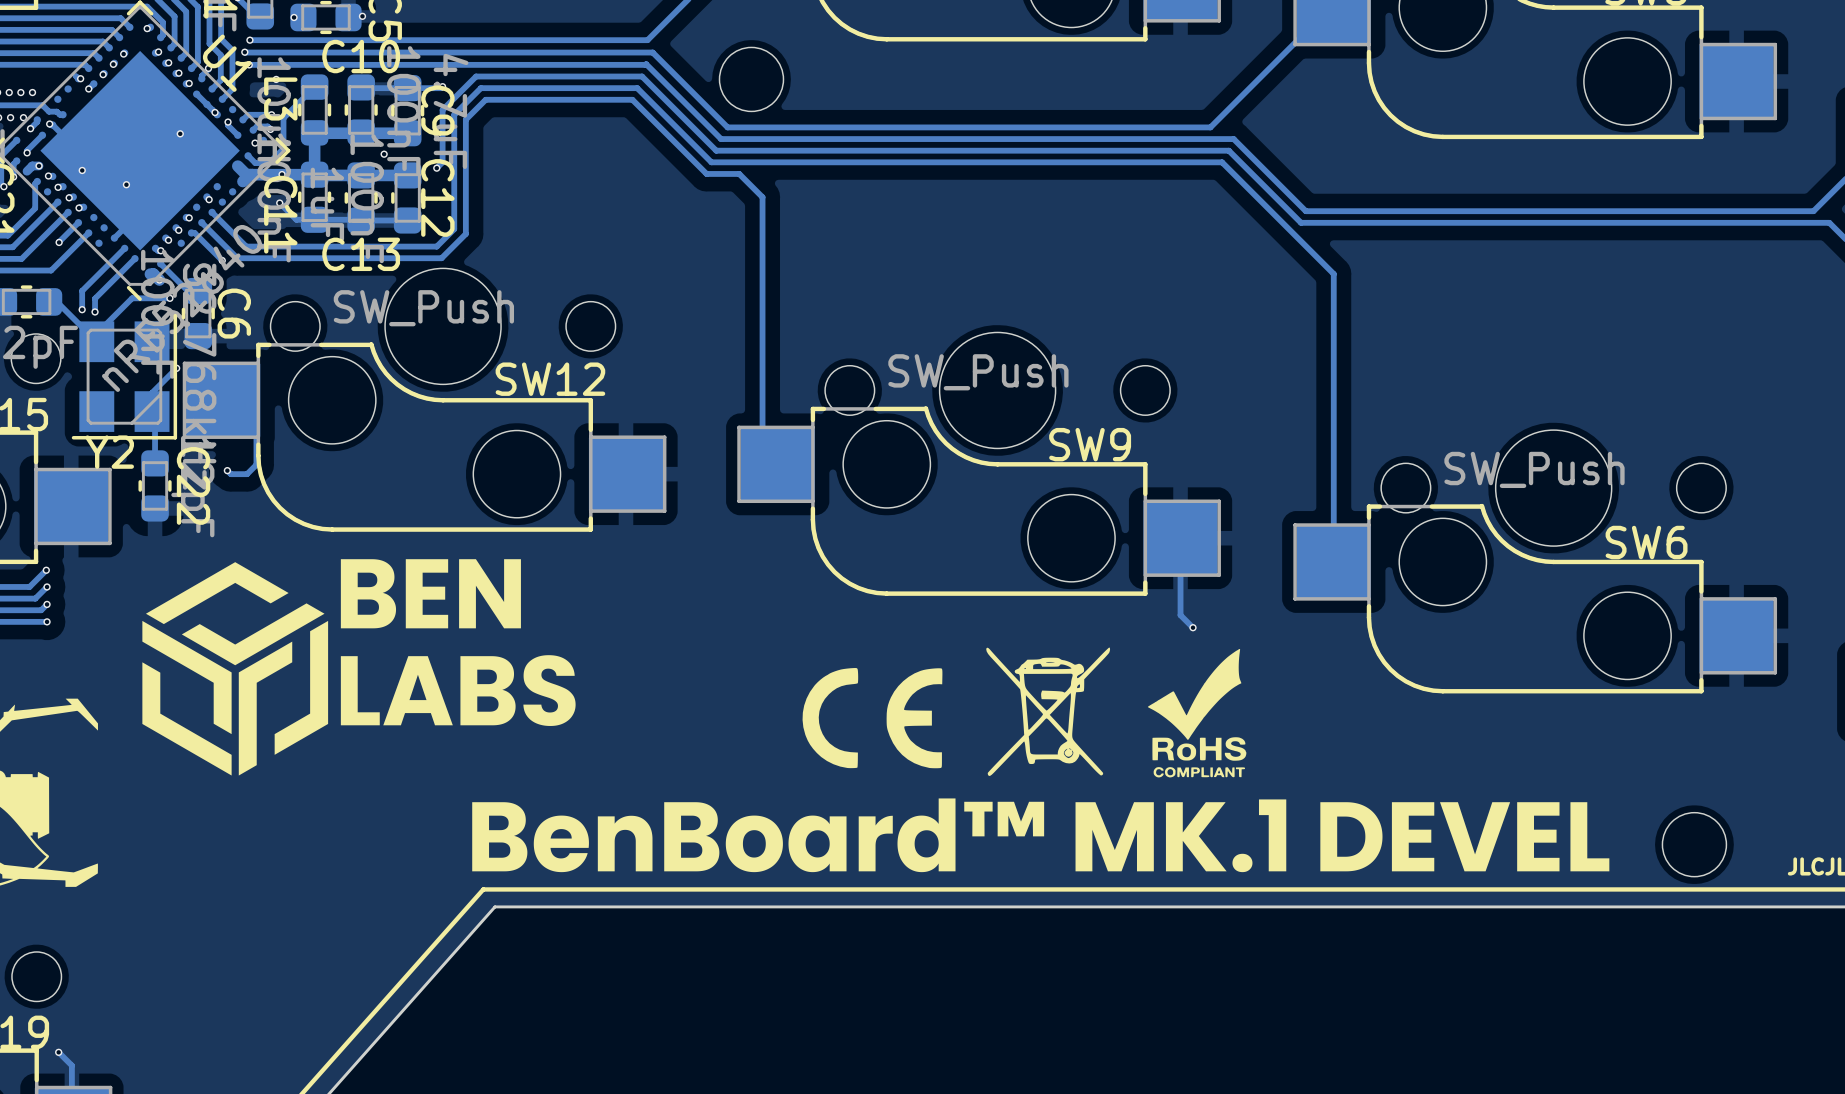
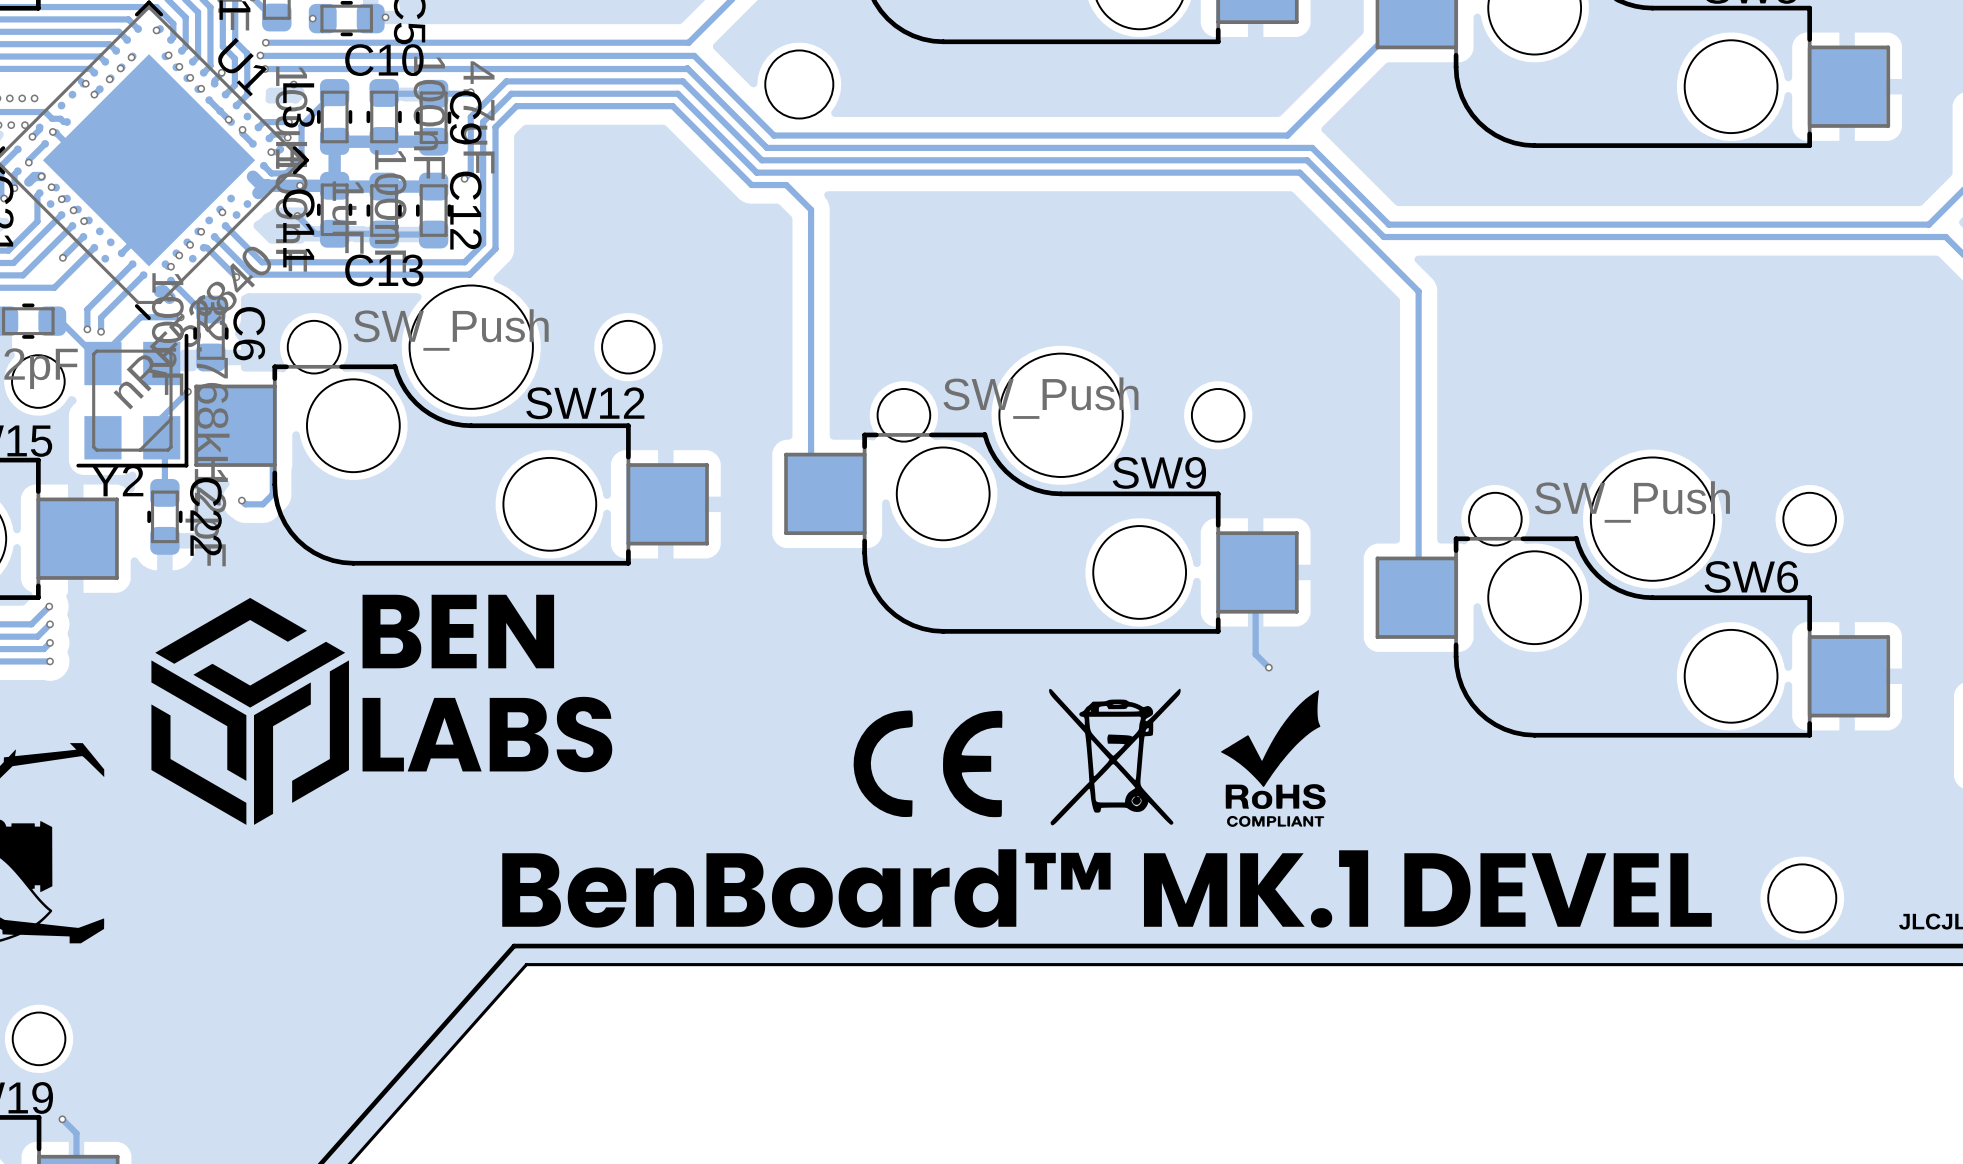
via: (180, 133) -> none
via: (384, 154) -> none
via: (82, 170) -> none
via: (126, 184) -> none

